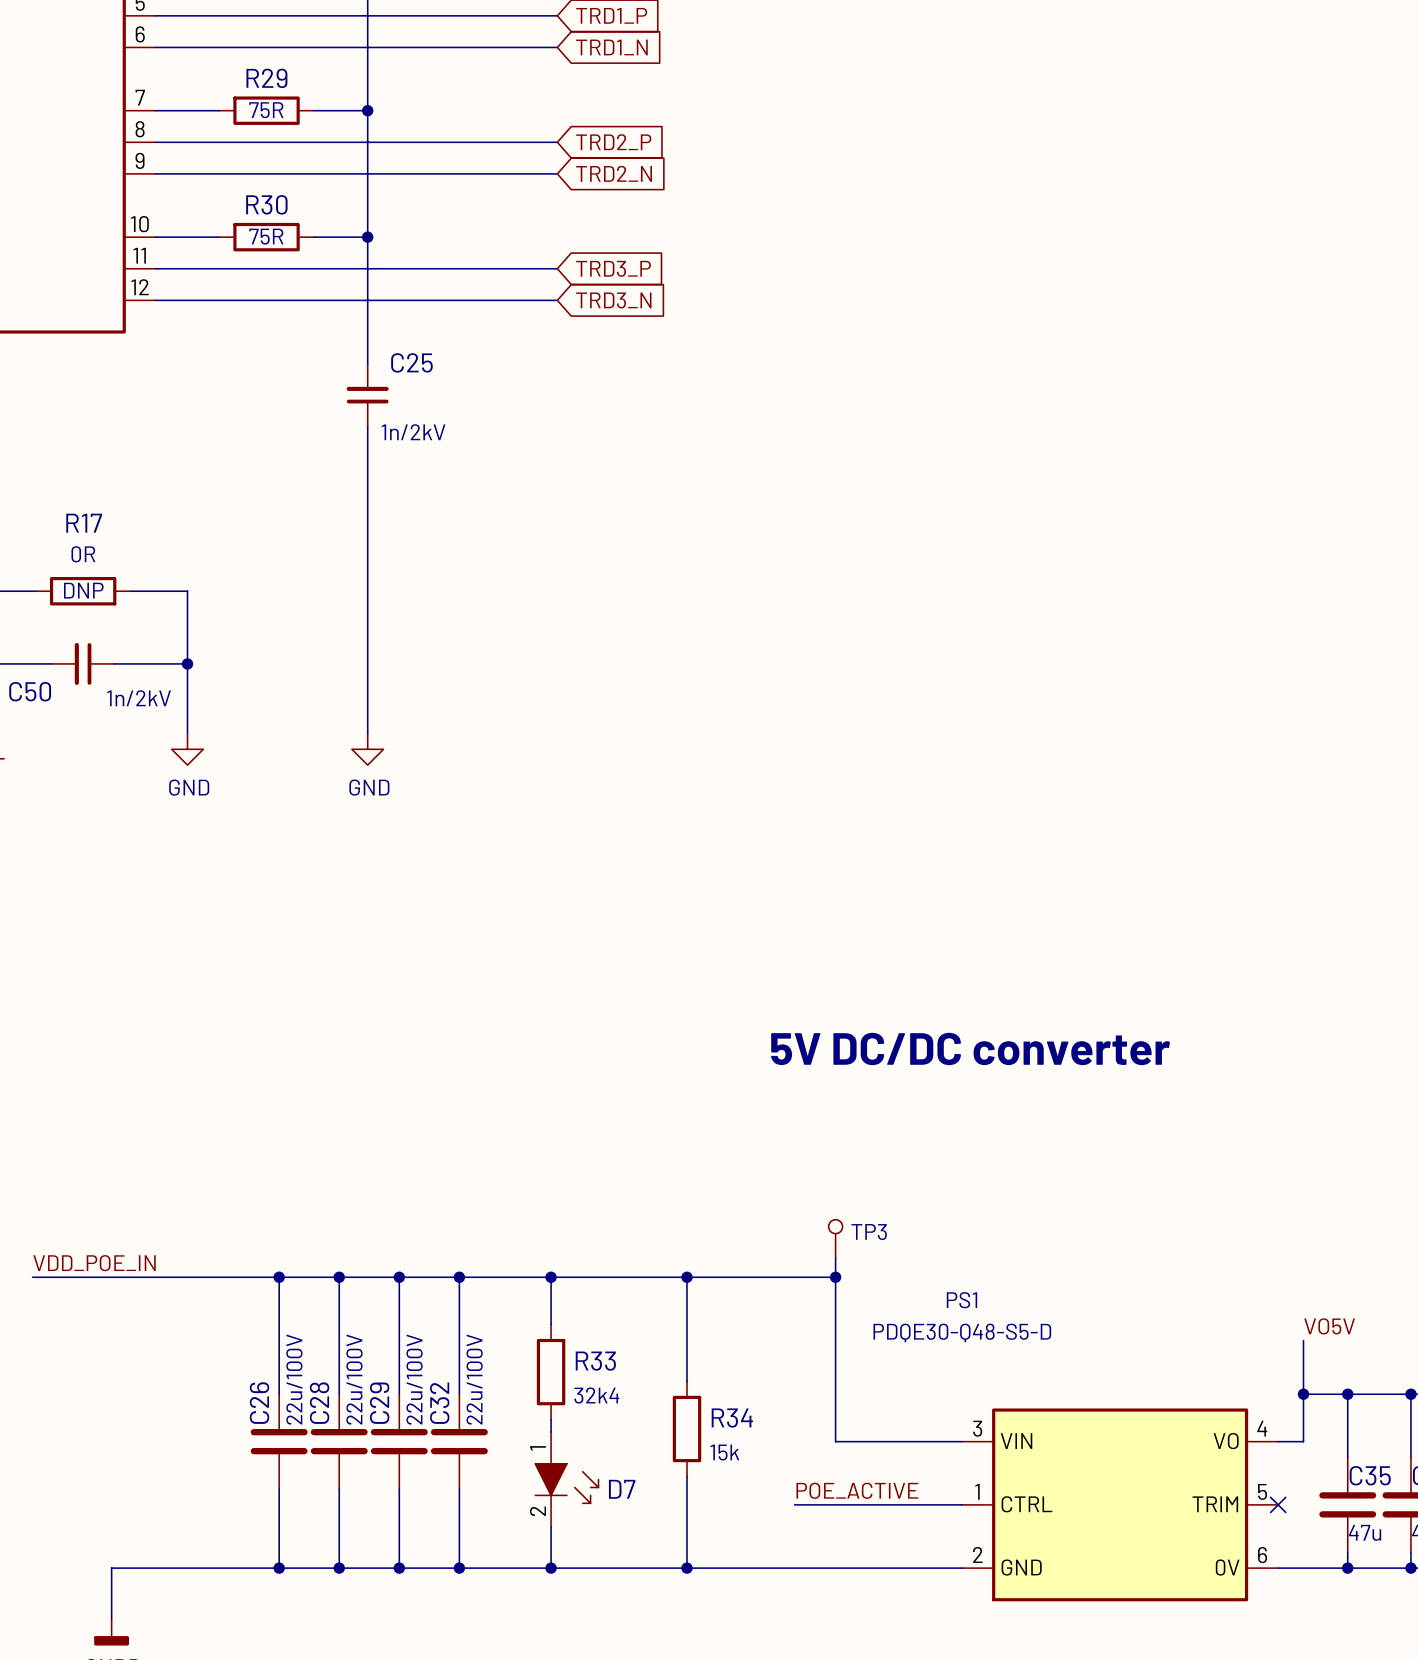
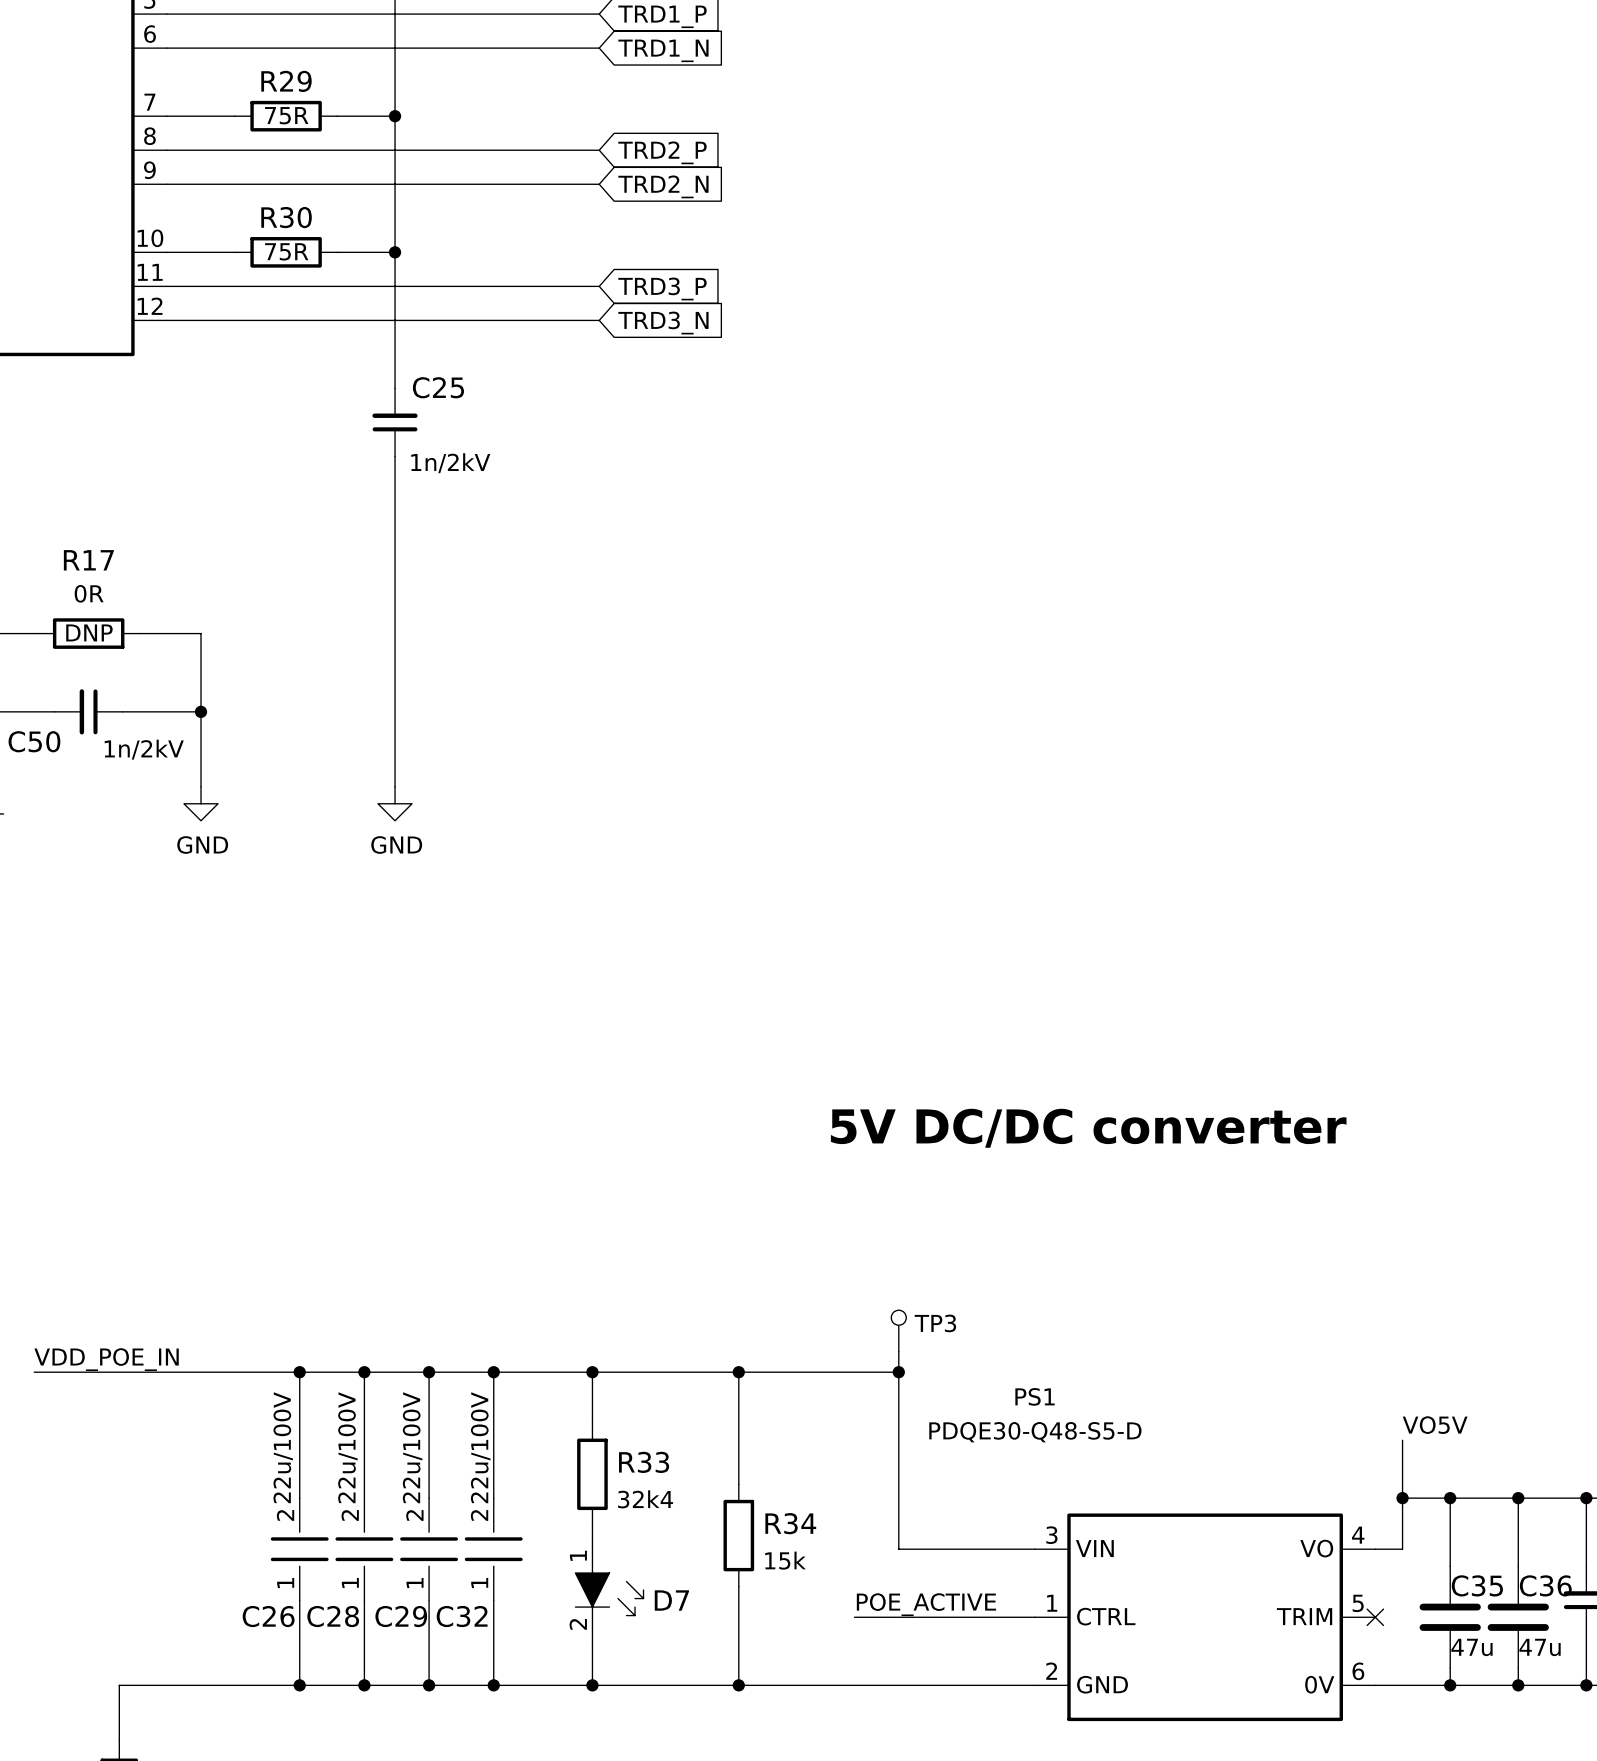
C26 text position: 22u/100V (294, 1379) -> 22u/100V (283, 1447)
C28 text position: 22u/100V (354, 1379) -> 22u/100V (347, 1447)
C29 text position: 22u/100V (414, 1379) -> 22u/100V (412, 1447)
C32 text position: 22u/100V (474, 1379) -> 22u/100V (480, 1447)
C26 symbol: [250, 1394, 308, 1490] -> [270, 1498, 329, 1601]
C28 symbol: [310, 1394, 368, 1490] -> [335, 1498, 394, 1601]
C29 symbol: [370, 1394, 428, 1490] -> [400, 1498, 459, 1601]
C32 symbol: [430, 1394, 488, 1490] -> [464, 1498, 523, 1601]
C26 name position: C26 (259, 1403) -> C26 (268, 1616)
C28 name position: C28 (319, 1403) -> C28 (333, 1616)
C29 name position: C29 (379, 1403) -> C29 (401, 1616)
C32 name position: C32 (439, 1403) -> C32 (462, 1616)

